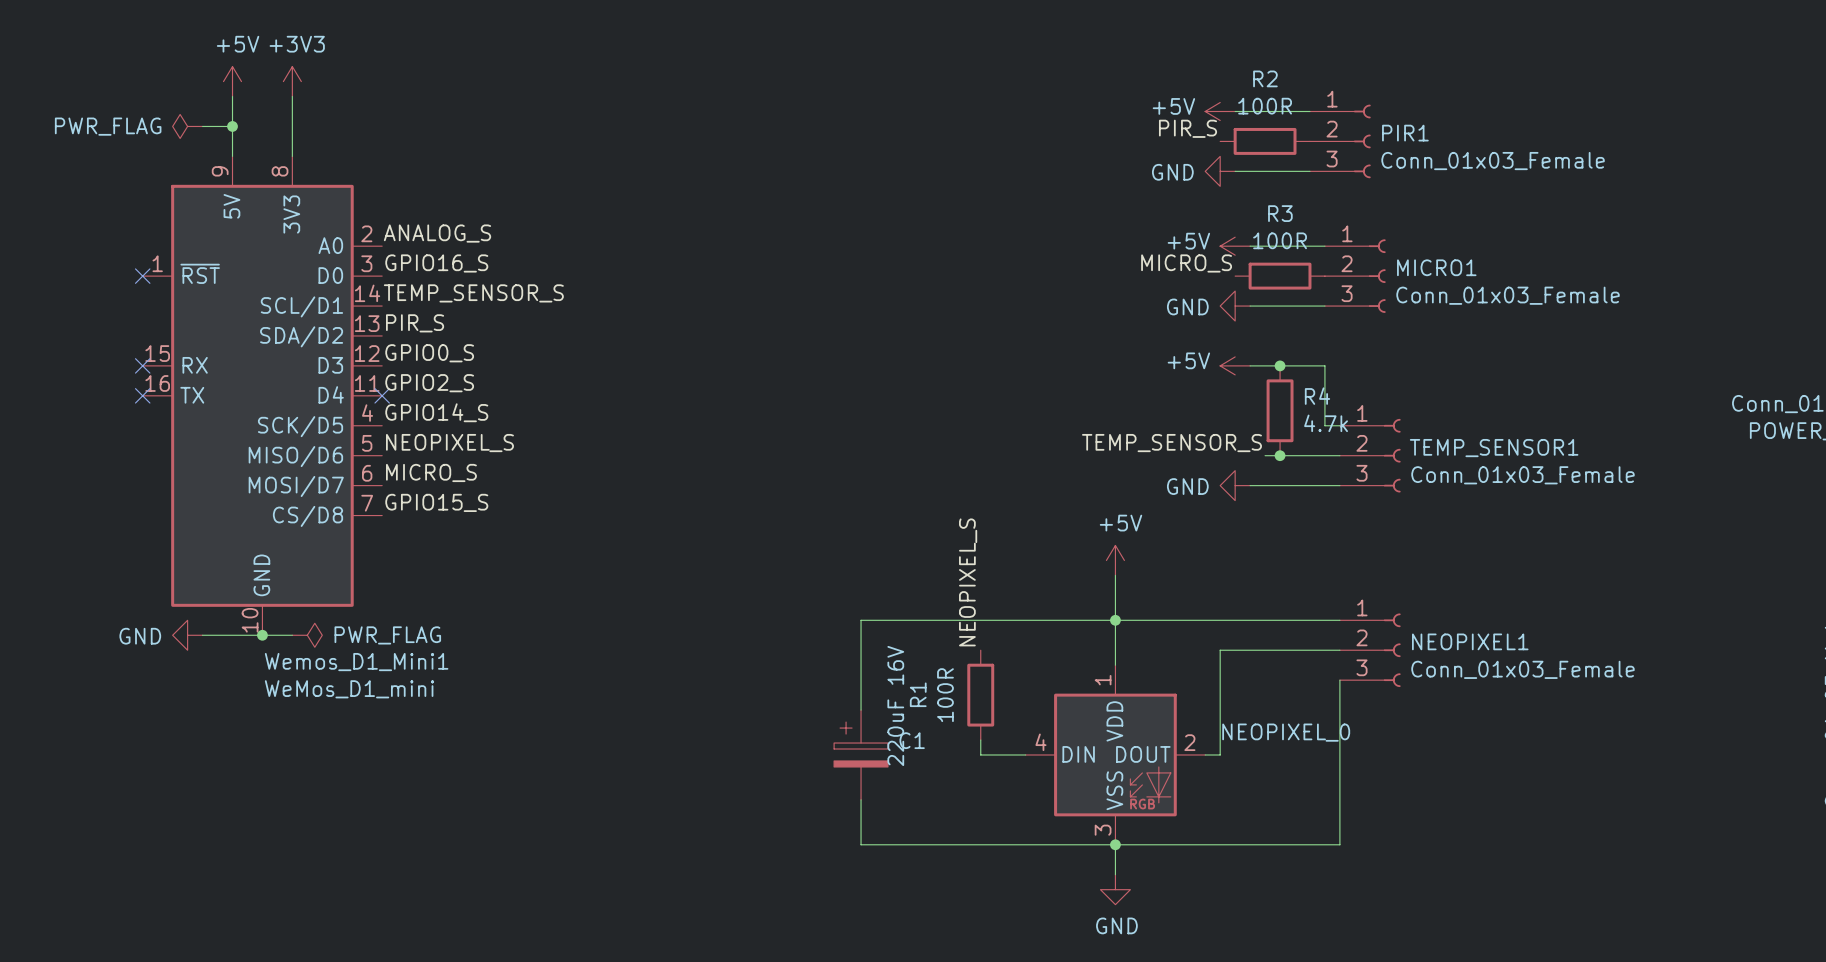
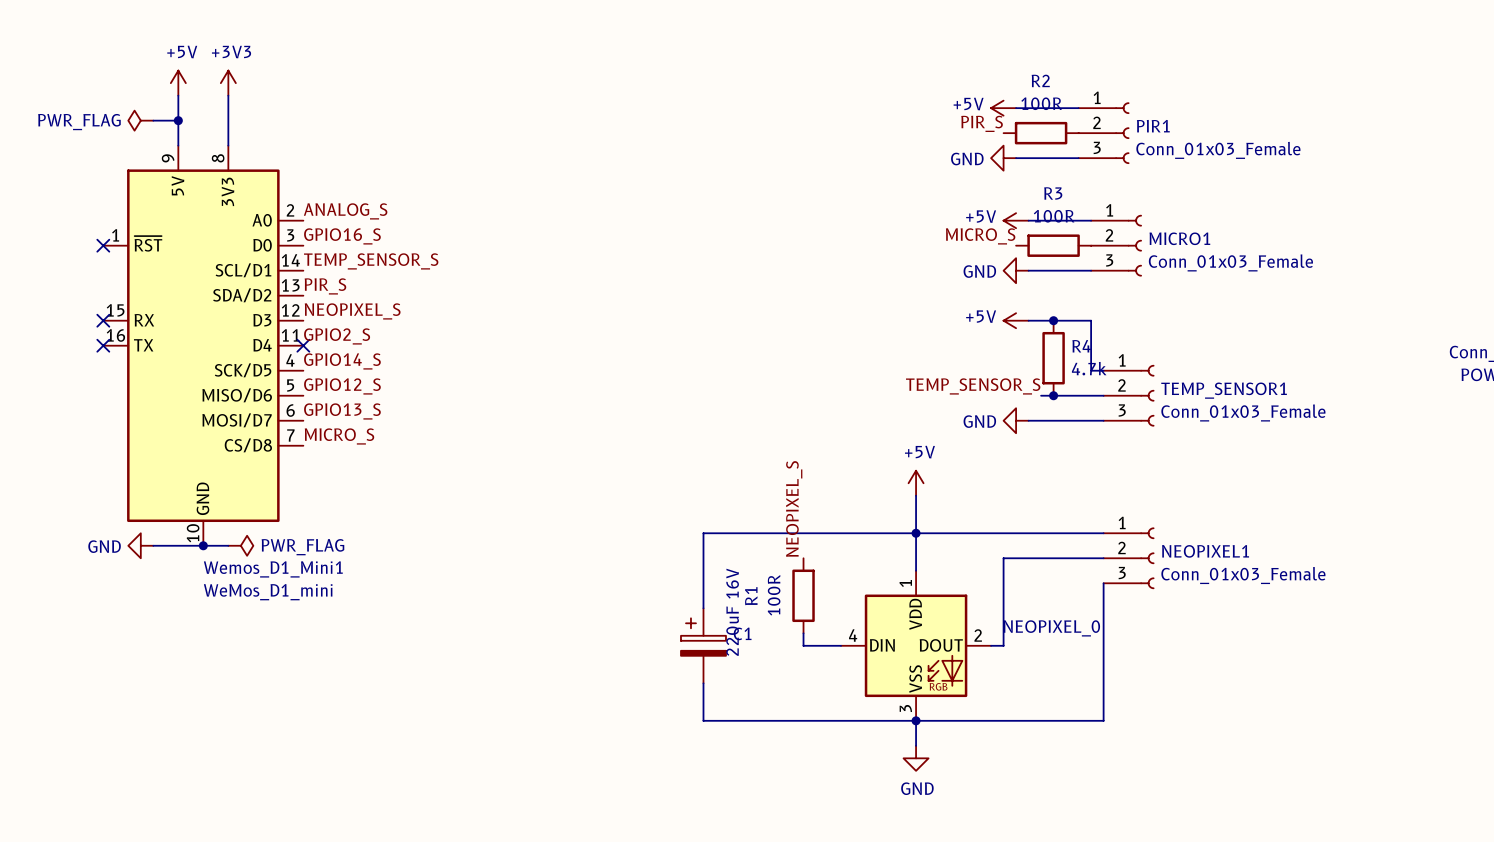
label: GPIO0_S (429, 353) -> NEOPIXEL_S (352, 311)
label: NEOPIXEL_S (449, 443) -> GPIO12_S (342, 386)
label: MICRO_S (431, 472) -> GPIO13_S (342, 411)
label: GPIO15_S (436, 502) -> MICRO_S (339, 436)

